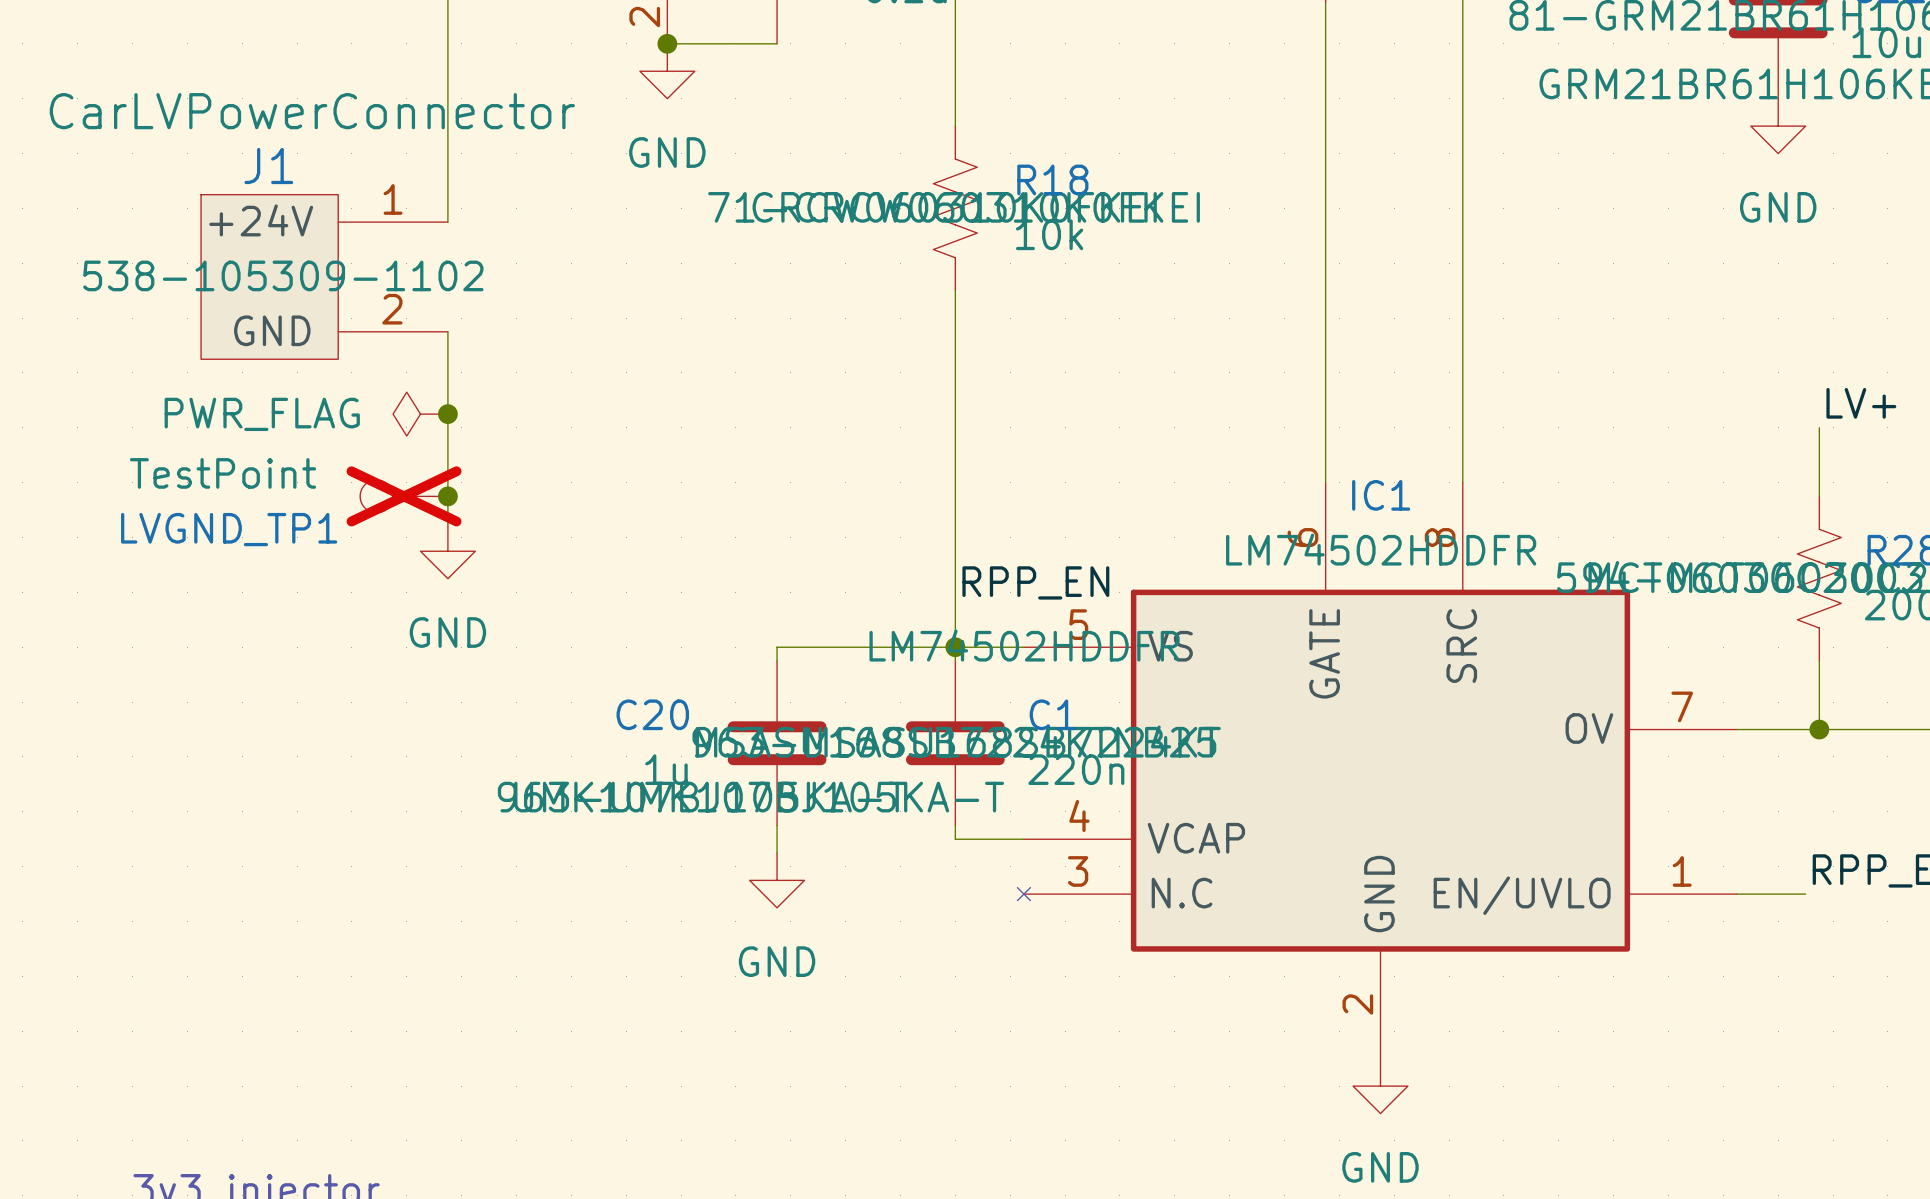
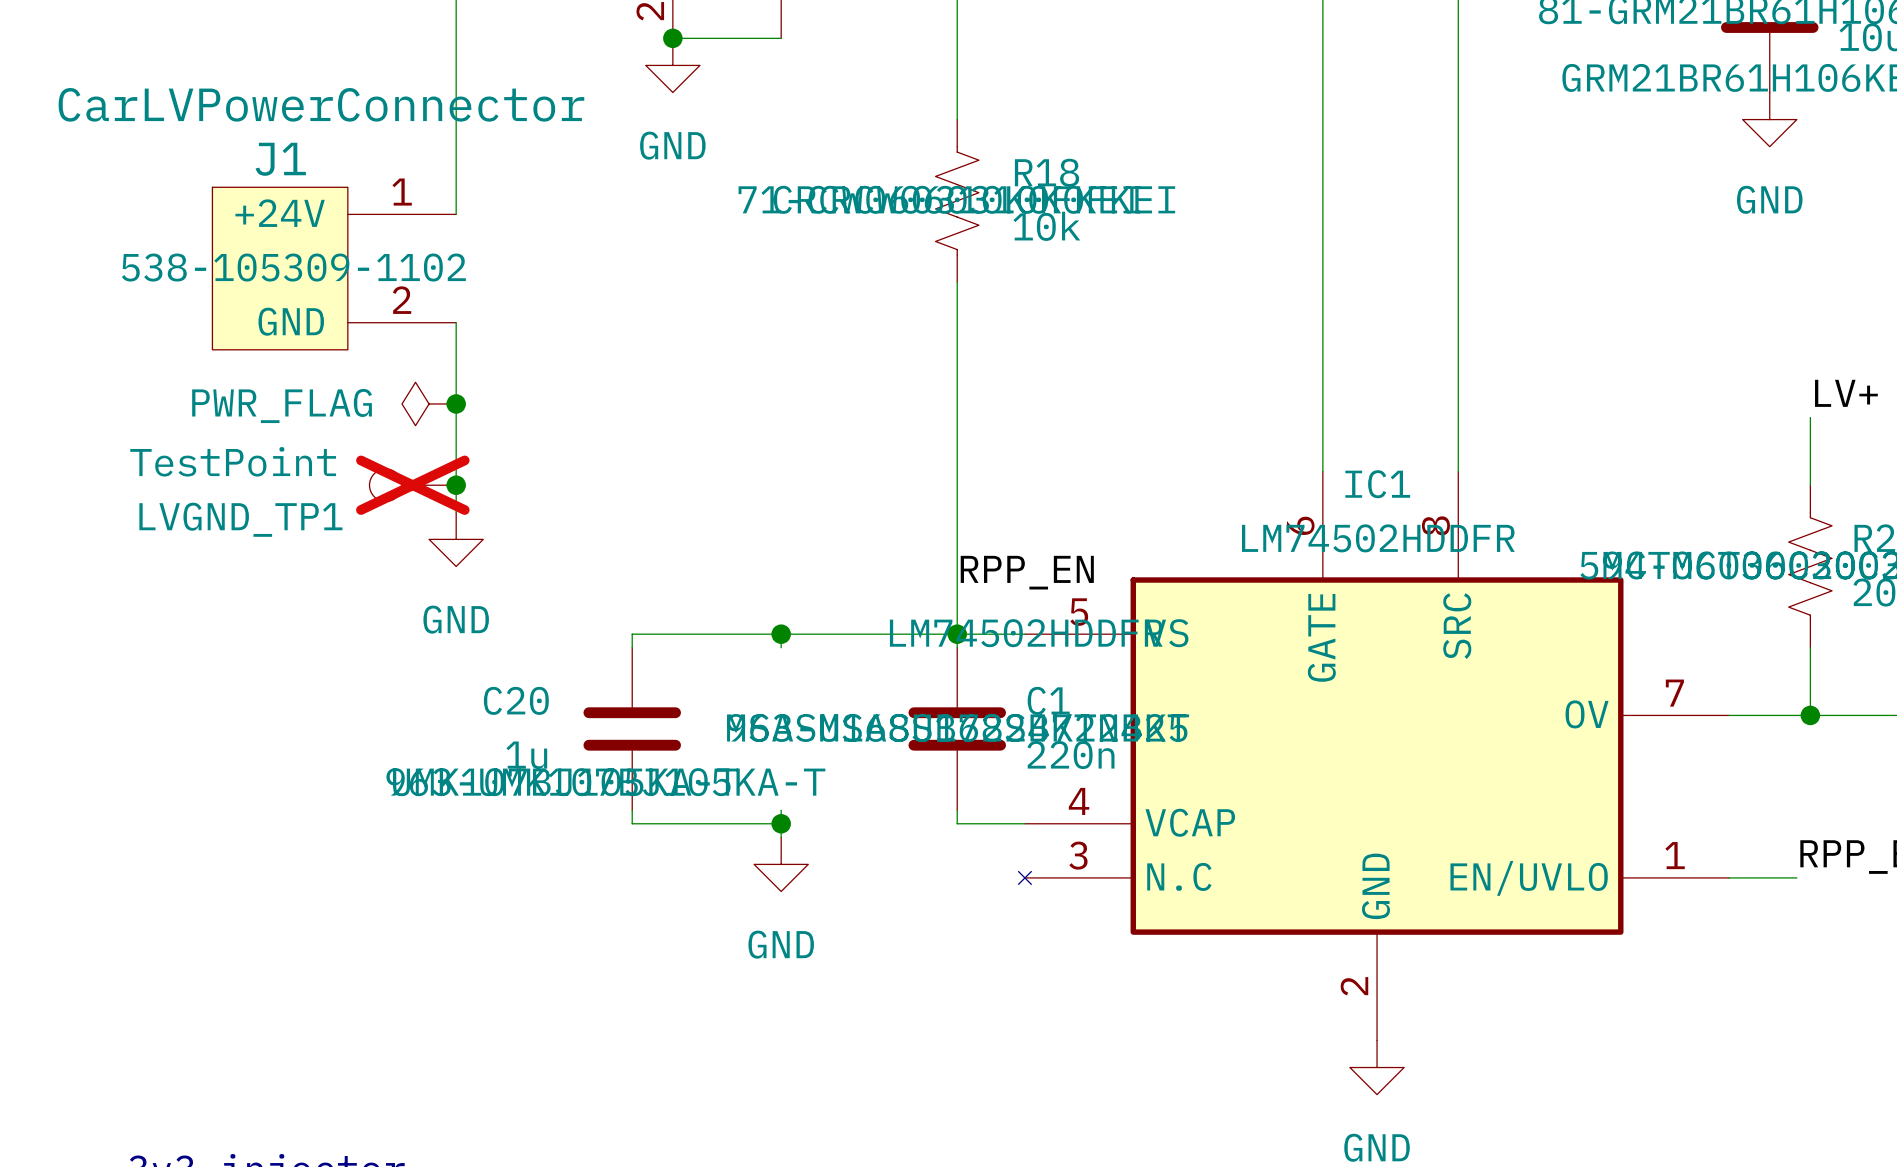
wire: none -> (781, 634) (632, 634) (632, 647)
junction: none -> (781, 634)
C20 position: (777, 743) -> (632, 728)
wire: none -> (632, 810) (632, 823) (781, 823)
junction: none -> (781, 823)

